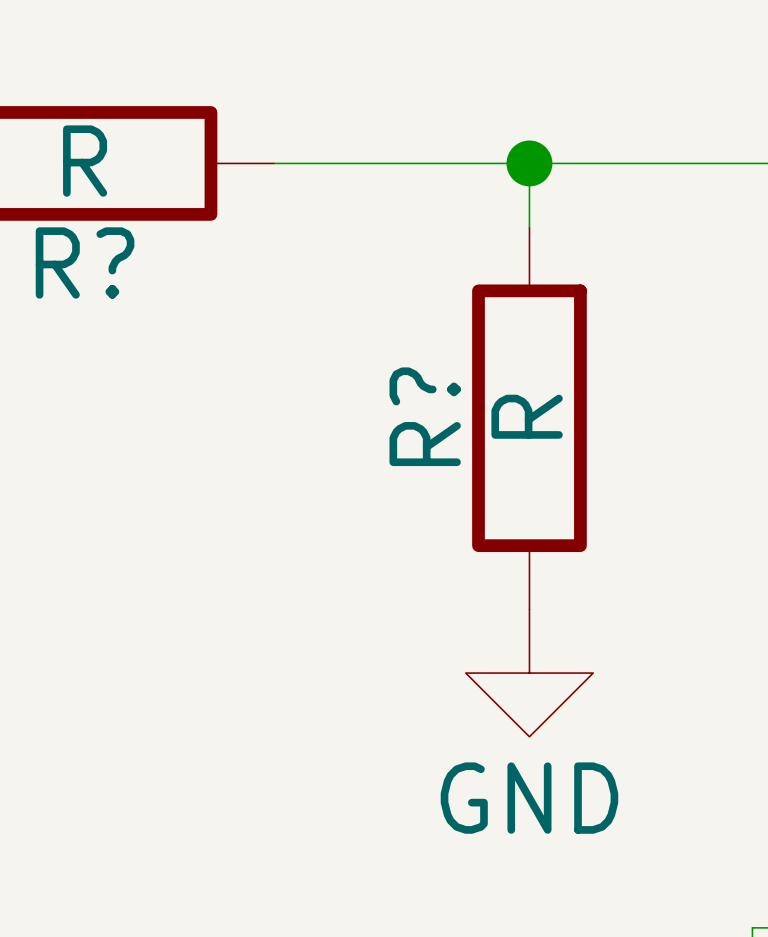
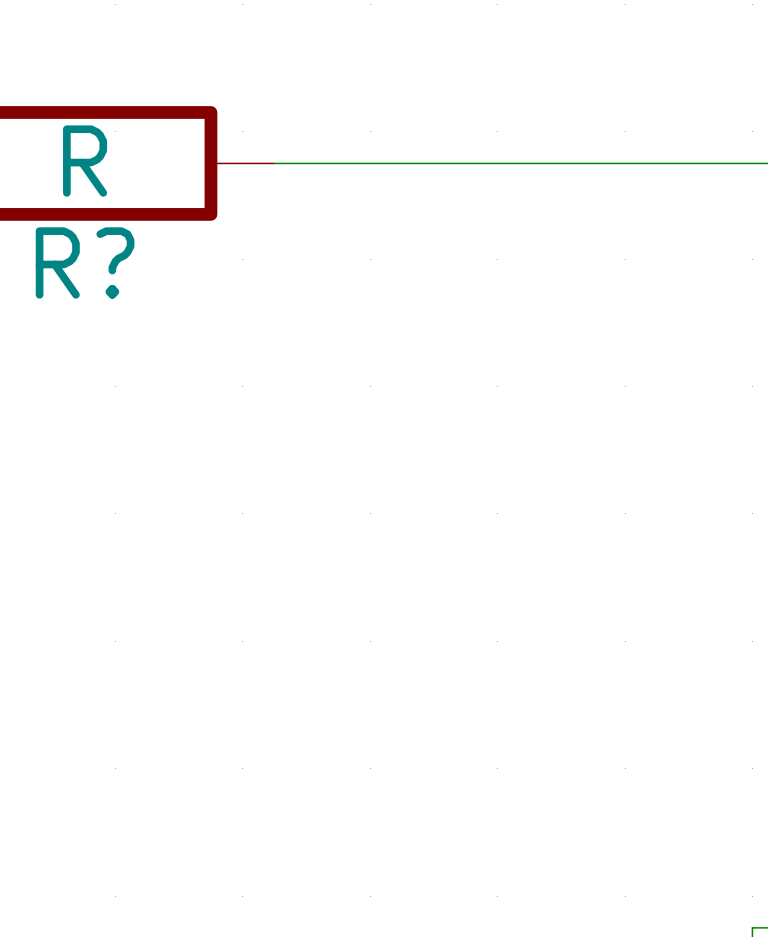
wire: (529, 163) (529, 227) -> none
junction: (529, 163) -> none
R?: R (529, 418) -> none
power symbol: GND (529, 673) -> none

